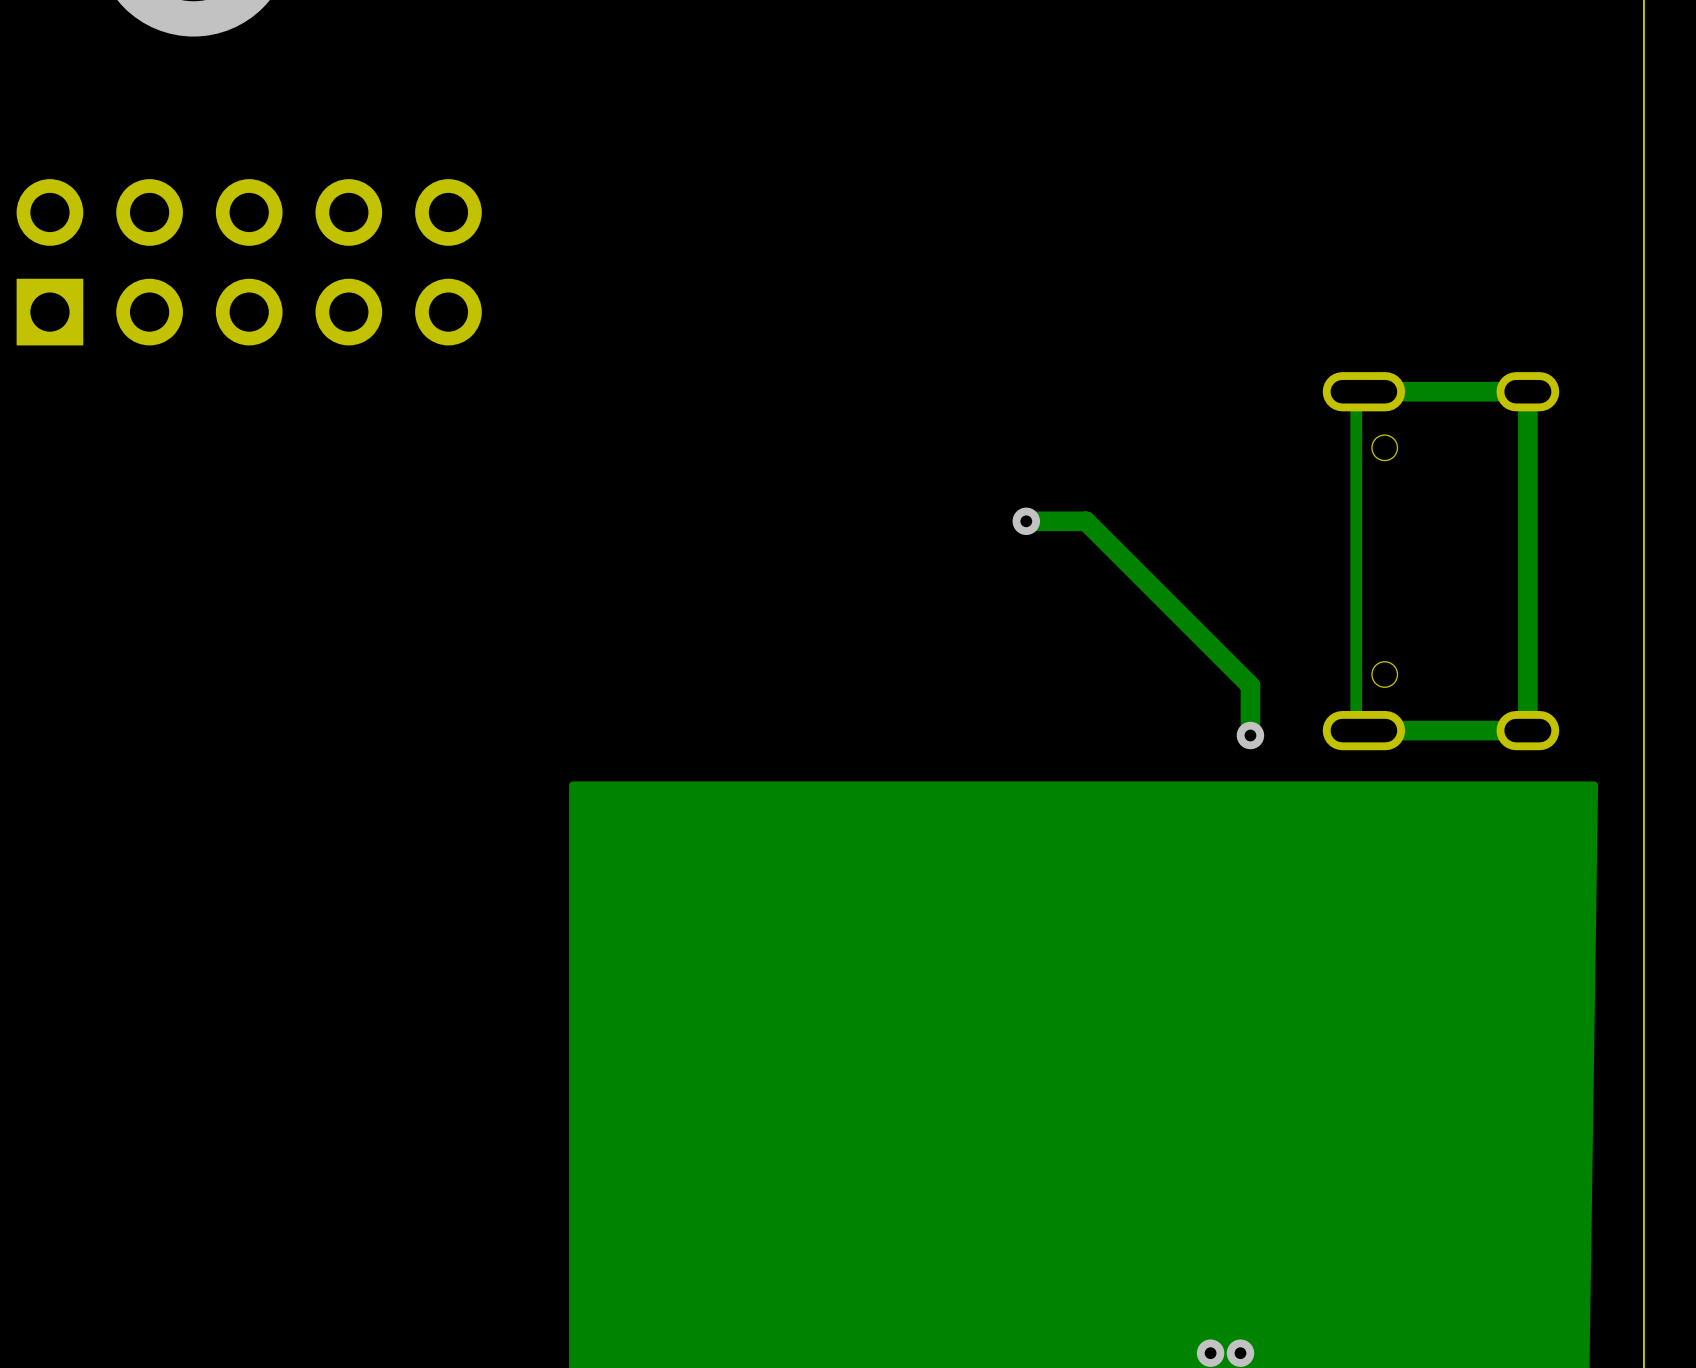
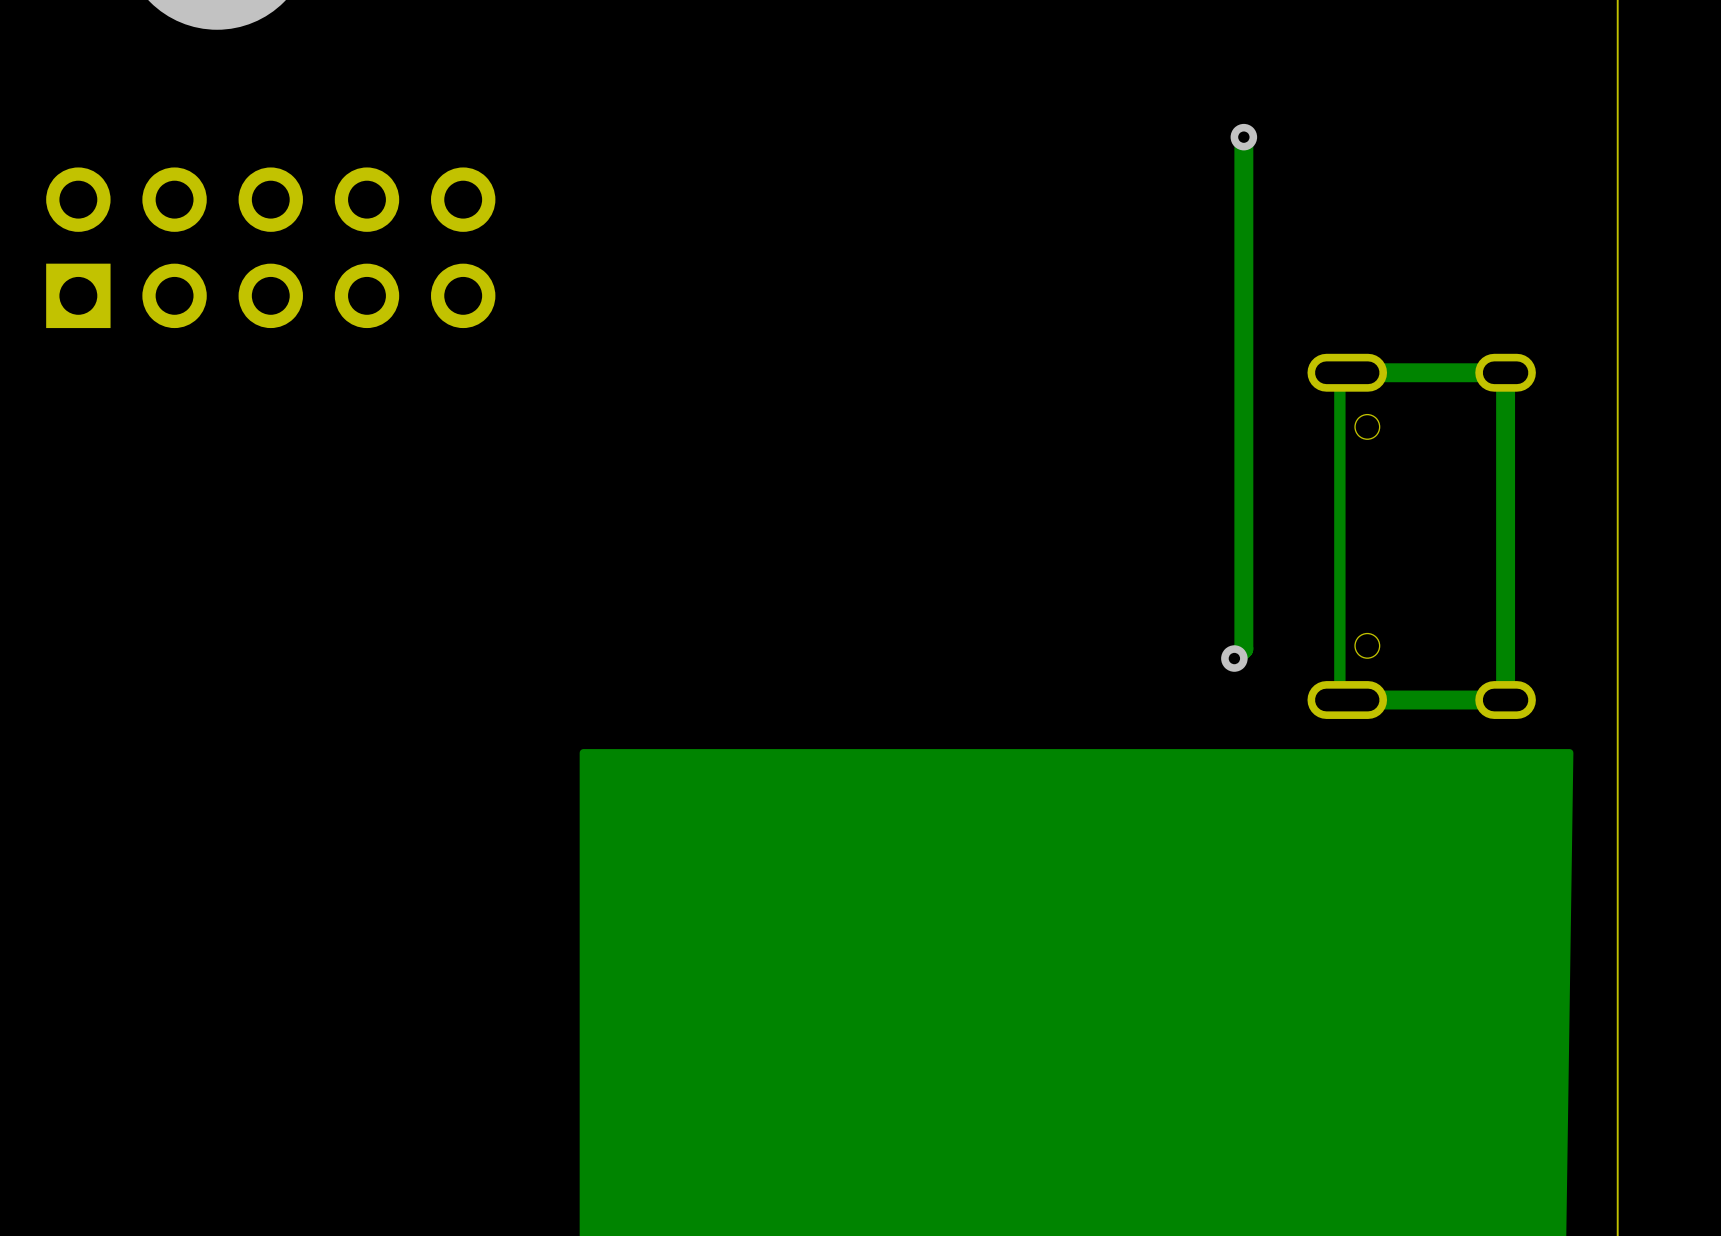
track: none -> (1243, 137) (1243, 649) (1234, 658)
via: none -> (1243, 137)
track: (1026, 521) (1086, 521) (1250, 685) (1250, 735) -> none
via: (1026, 521) -> none
via position: (1250, 735) -> (1234, 658)

